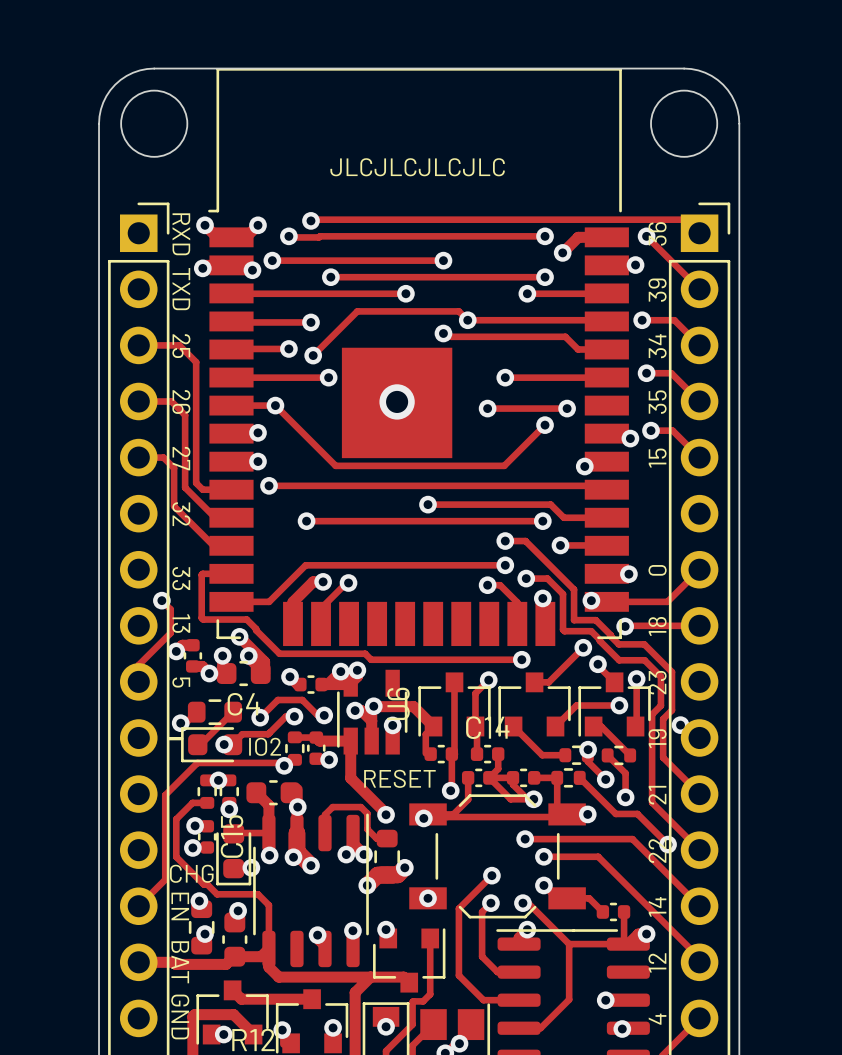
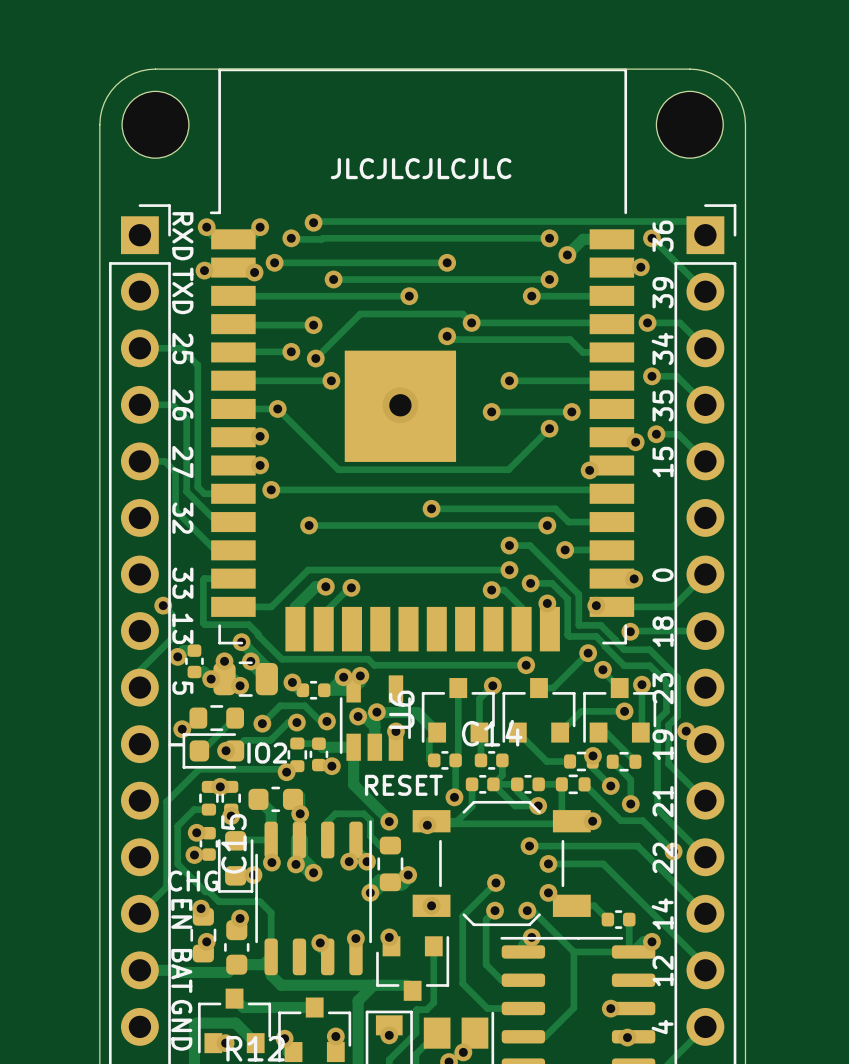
C4: (243, 673) -> none
part: none -> (245, 679)
via: none -> (240, 685)

